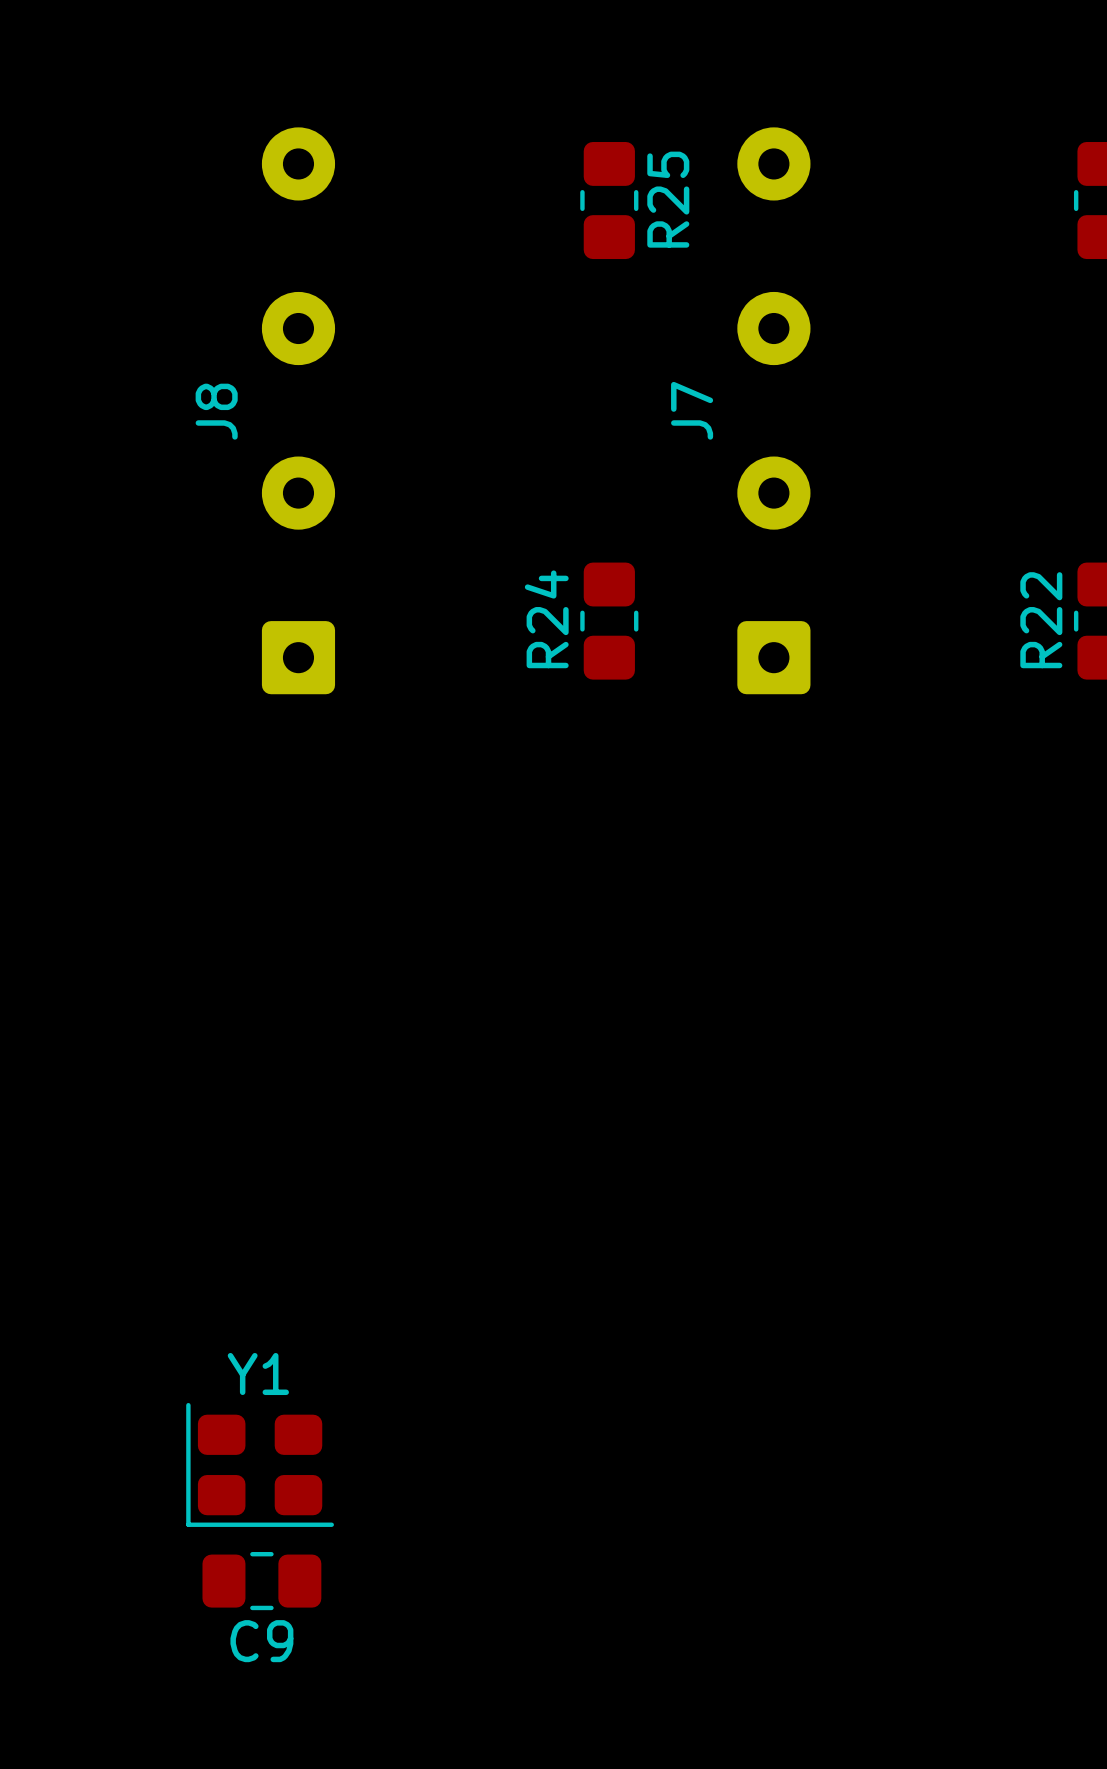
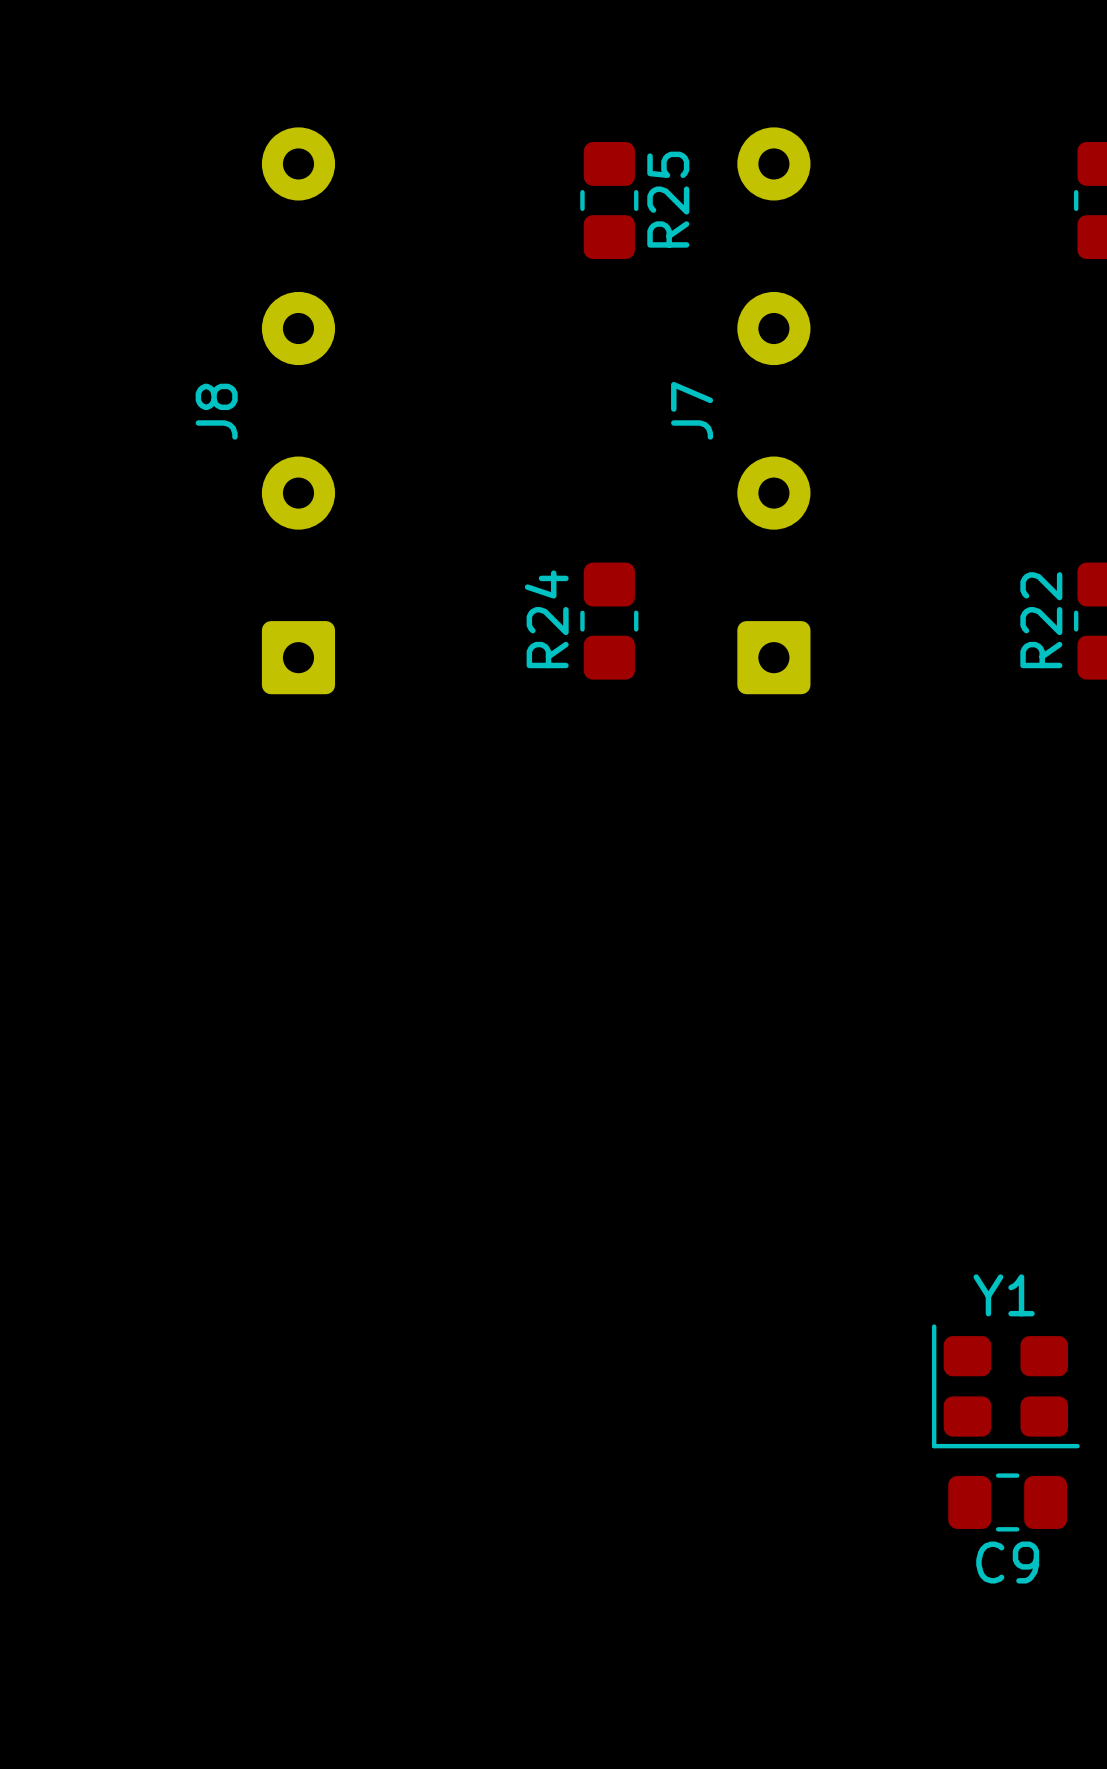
Y1 position: (260, 1464) -> (1005, 1386)
C9 position: (261, 1581) -> (1007, 1502)

